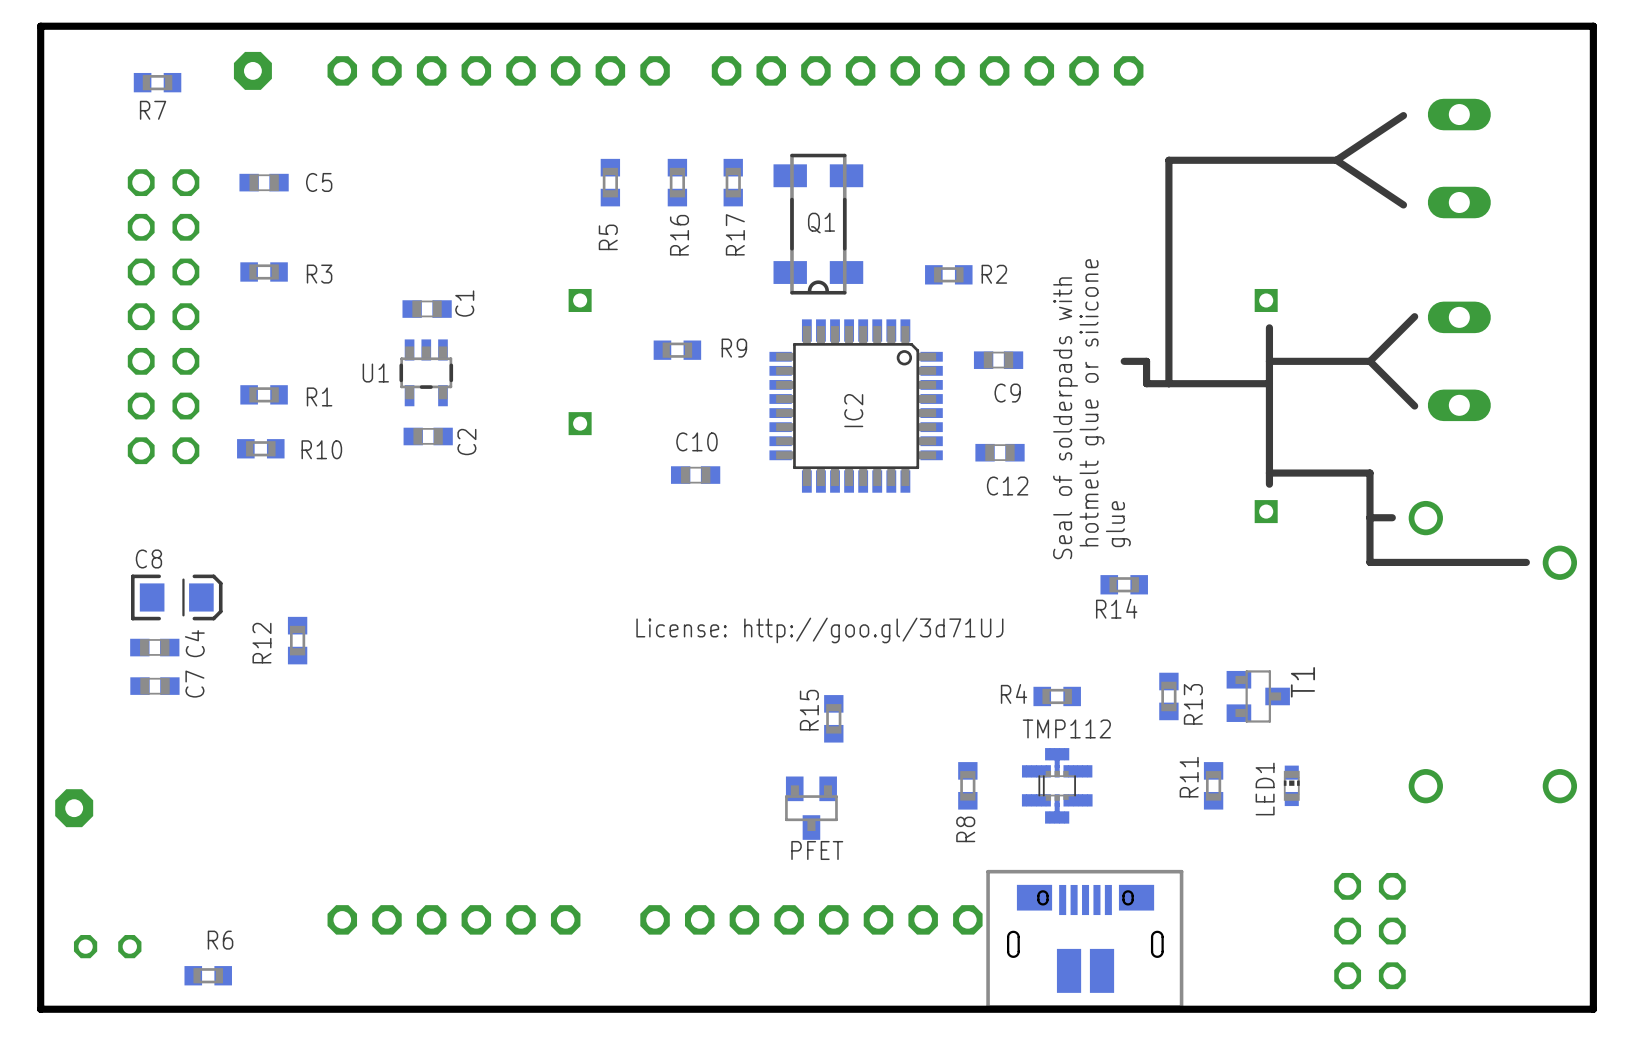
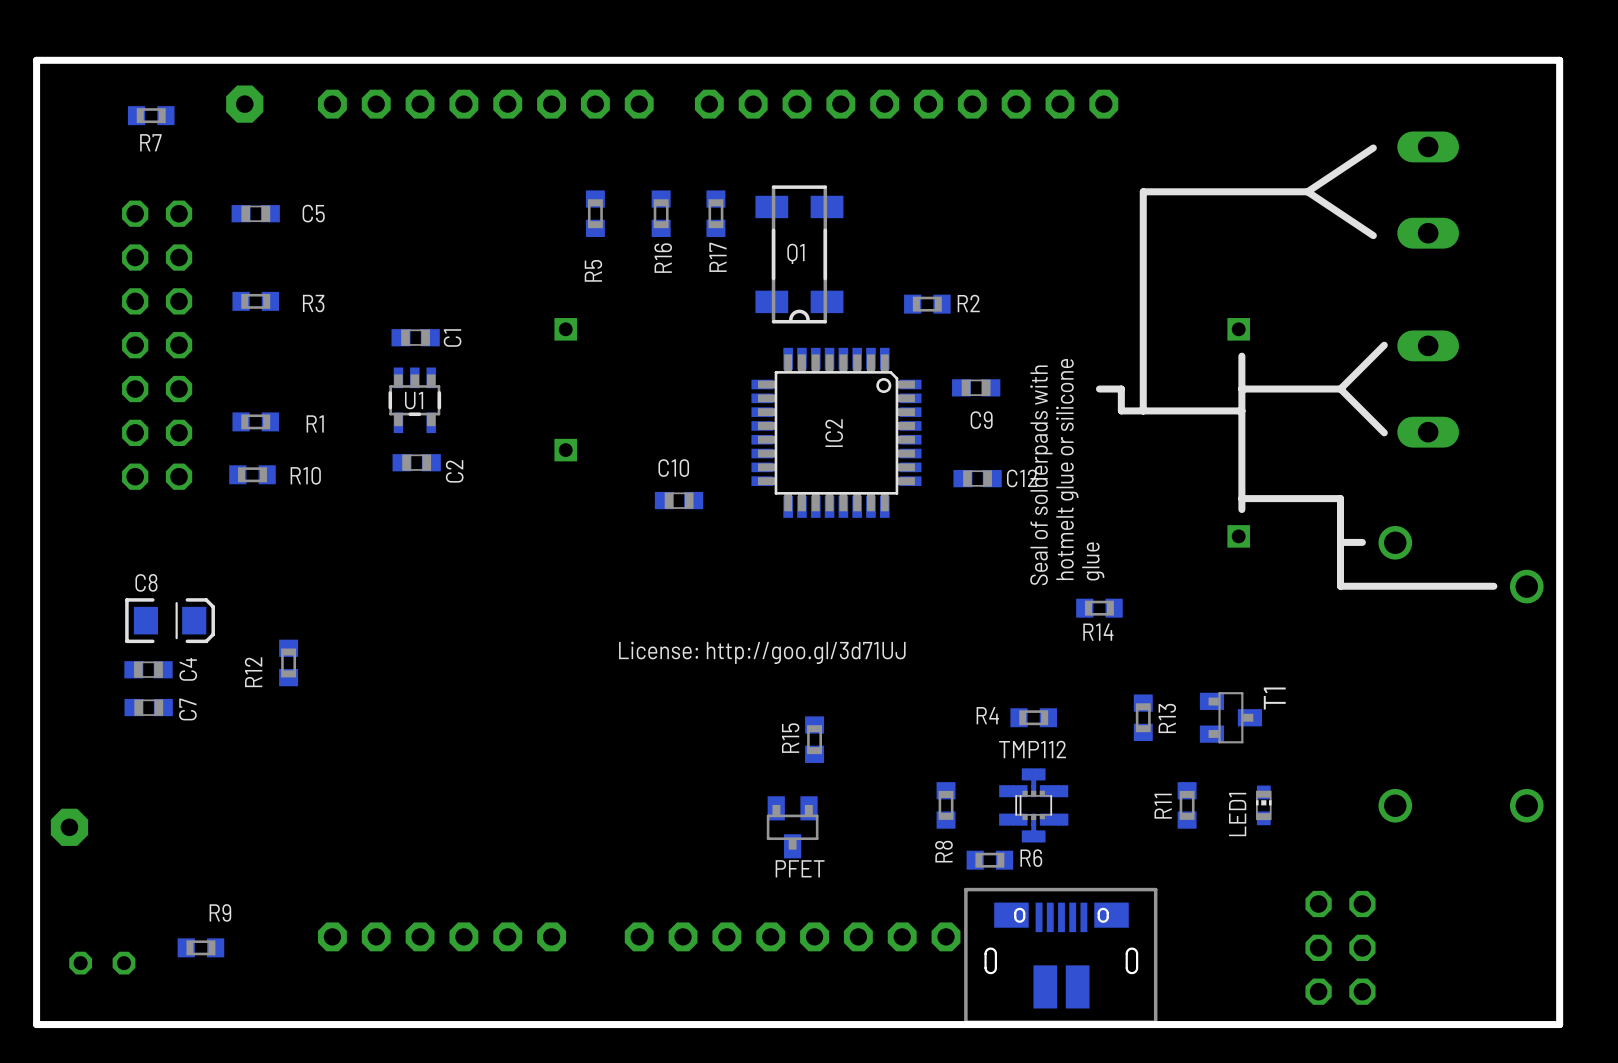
R9 name position: R9 (734, 348) -> R9 (220, 912)
R9 position: (677, 350) -> (200, 947)
U1 name position: U1 (375, 373) -> U1 (414, 400)
C12 name position: C12 (1007, 486) -> C12 (1022, 478)
R6 name position: R6 (220, 940) -> R6 (1031, 858)
R6 position: (208, 975) -> (989, 860)

